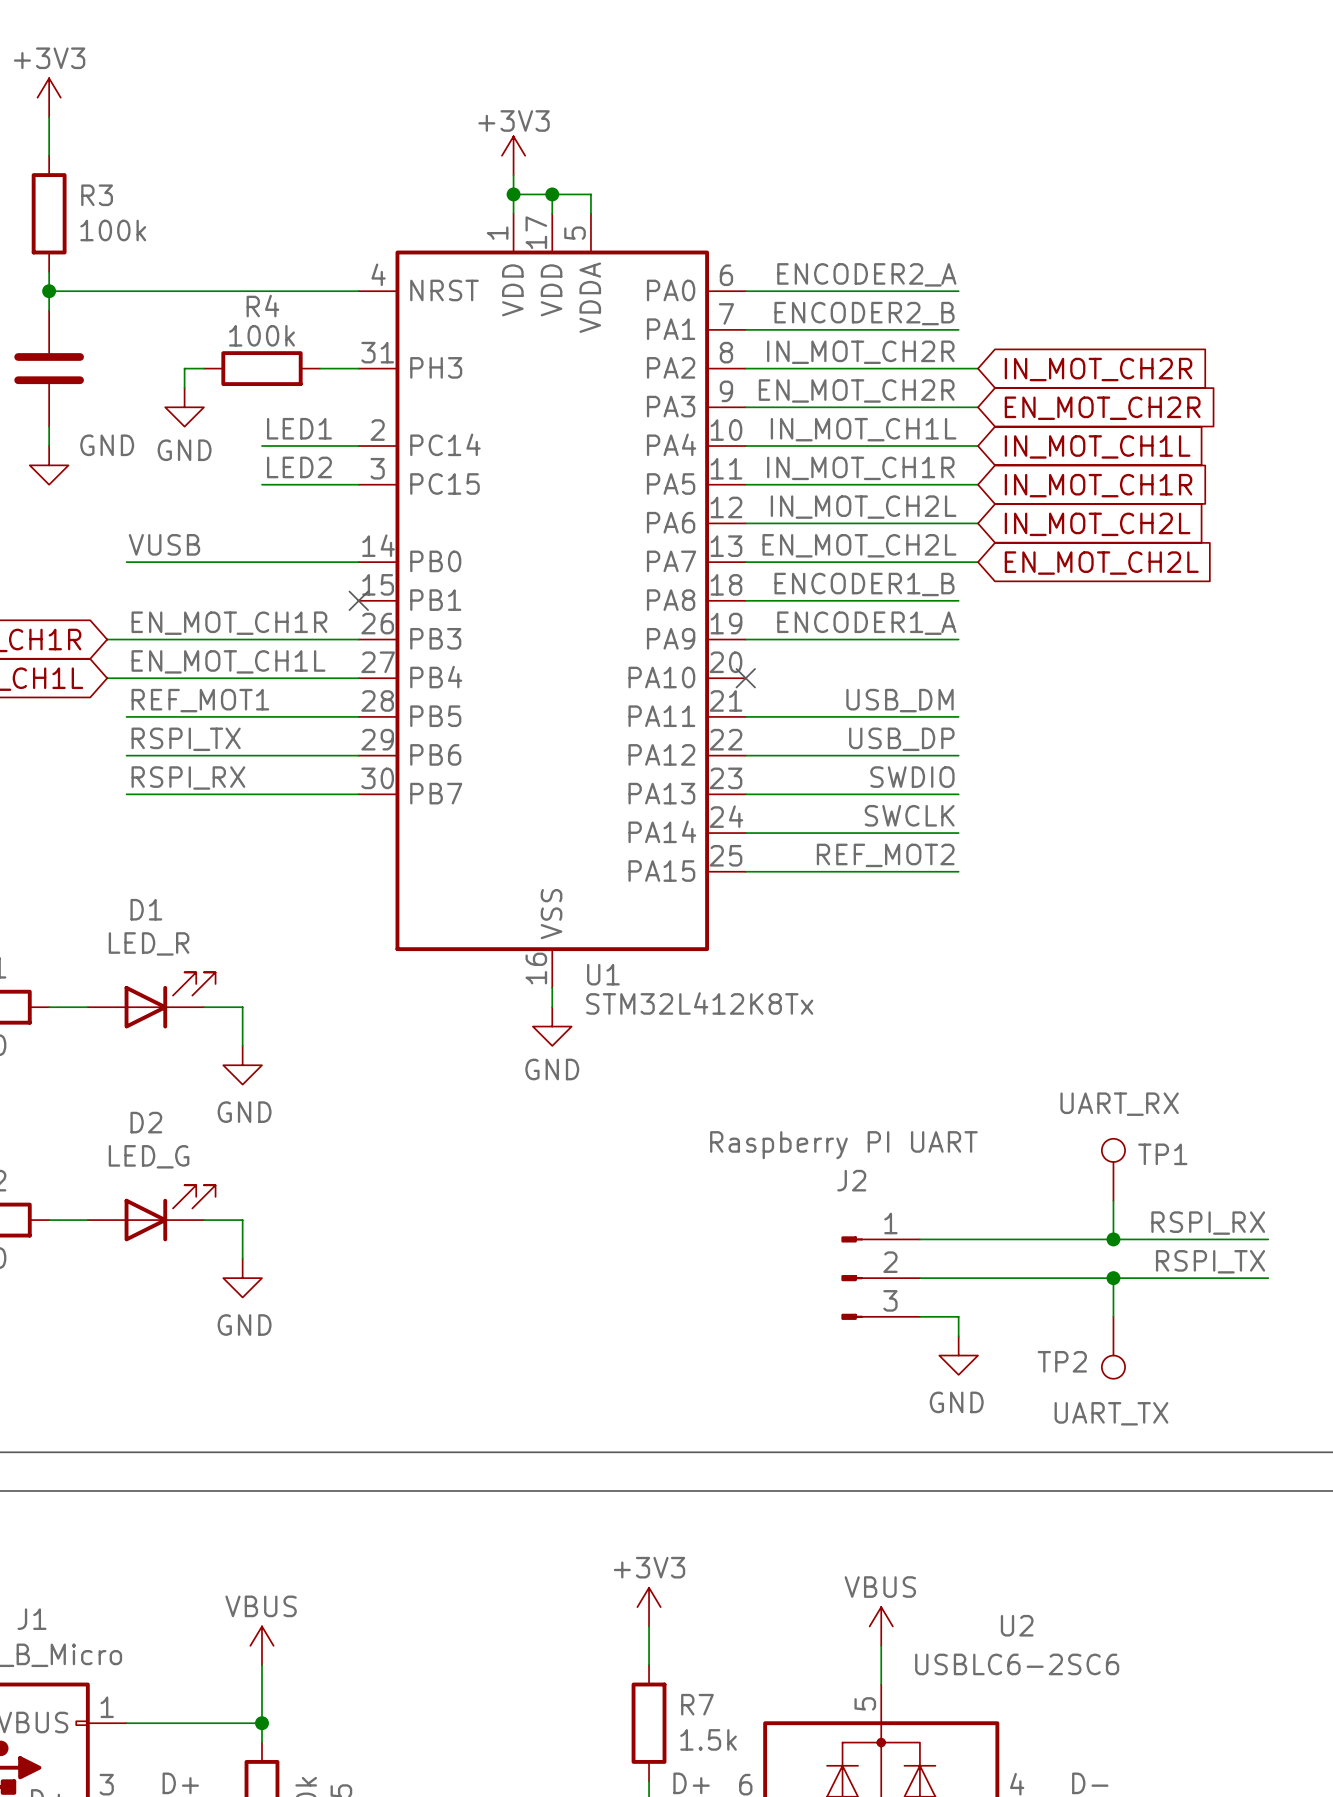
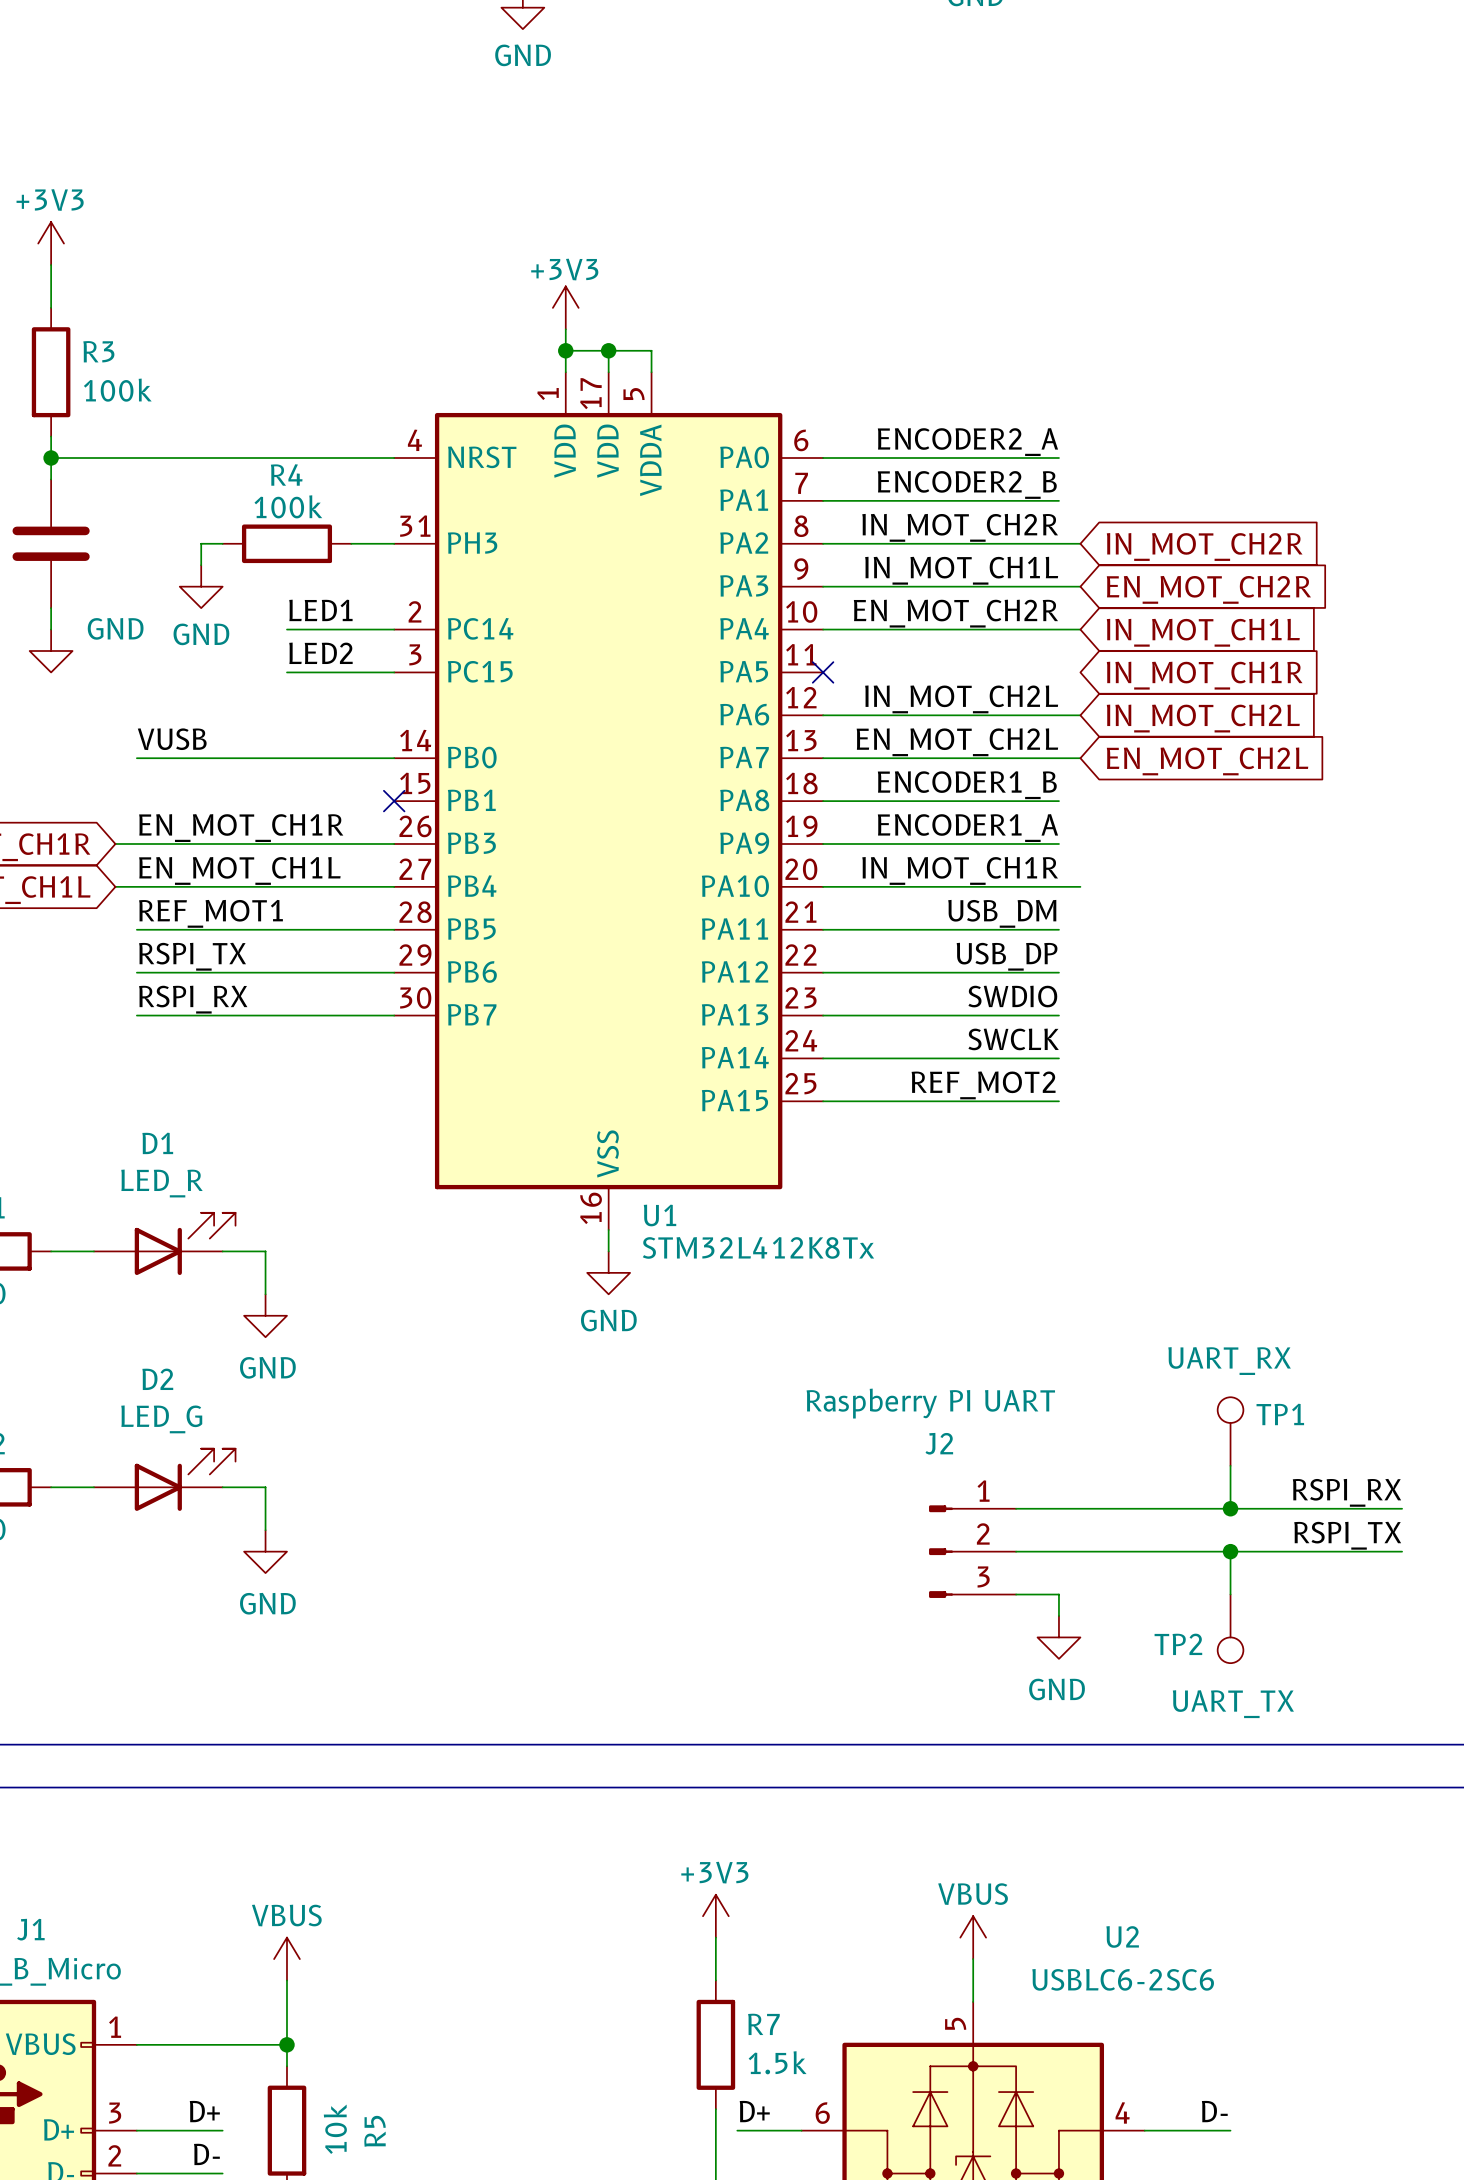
label: EN_MOT_CH2R (856, 390) -> IN_MOT_CH1L (961, 570)
label: IN_MOT_CH1L (863, 429) -> EN_MOT_CH2R (955, 613)
label position: IN_MOT_CH1R (860, 468) -> IN_MOT_CH1R (960, 870)
wire: (745, 484) (978, 484) -> (823, 886) (1080, 886)
no-connect mark: none -> (823, 672)
no-connect mark: (745, 678) -> none

